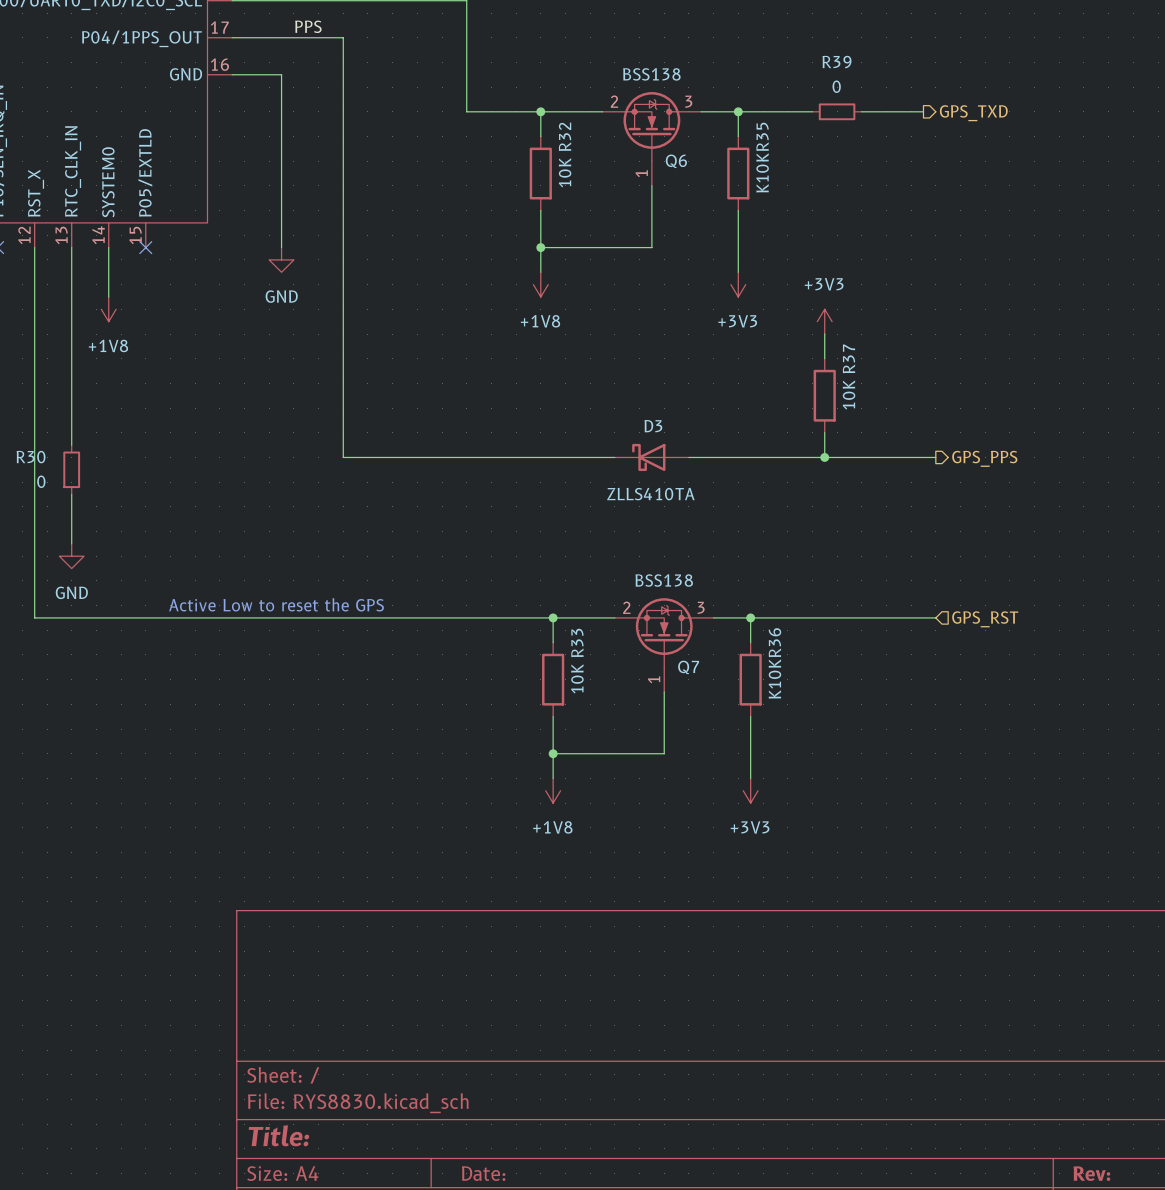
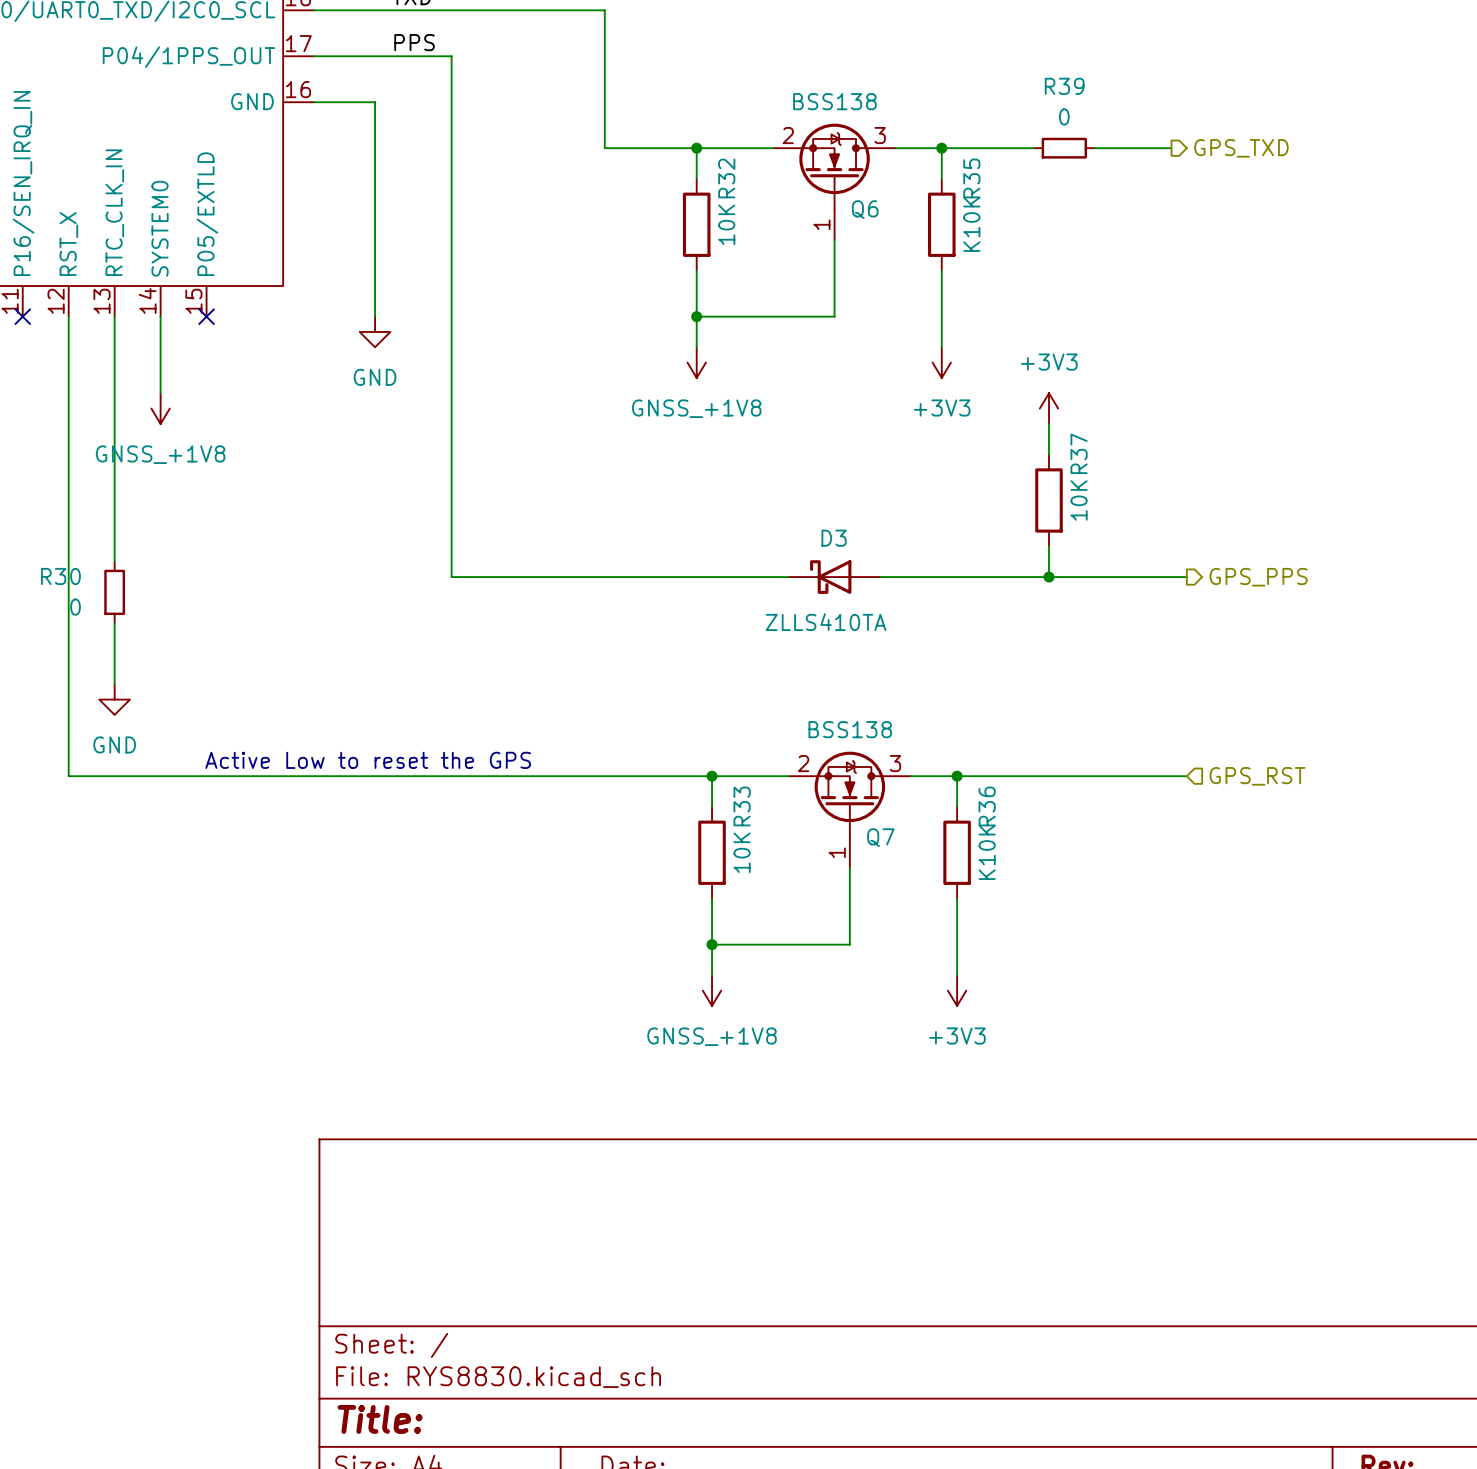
power symbol: +1V8 (540, 284) -> GNSS_+1V8 (696, 362)
power symbol: +1V8 (108, 309) -> none
power symbol: none -> GNSS_+1V8 (160, 408)
power symbol: +1V8 (553, 790) -> GNSS_+1V8 (712, 990)

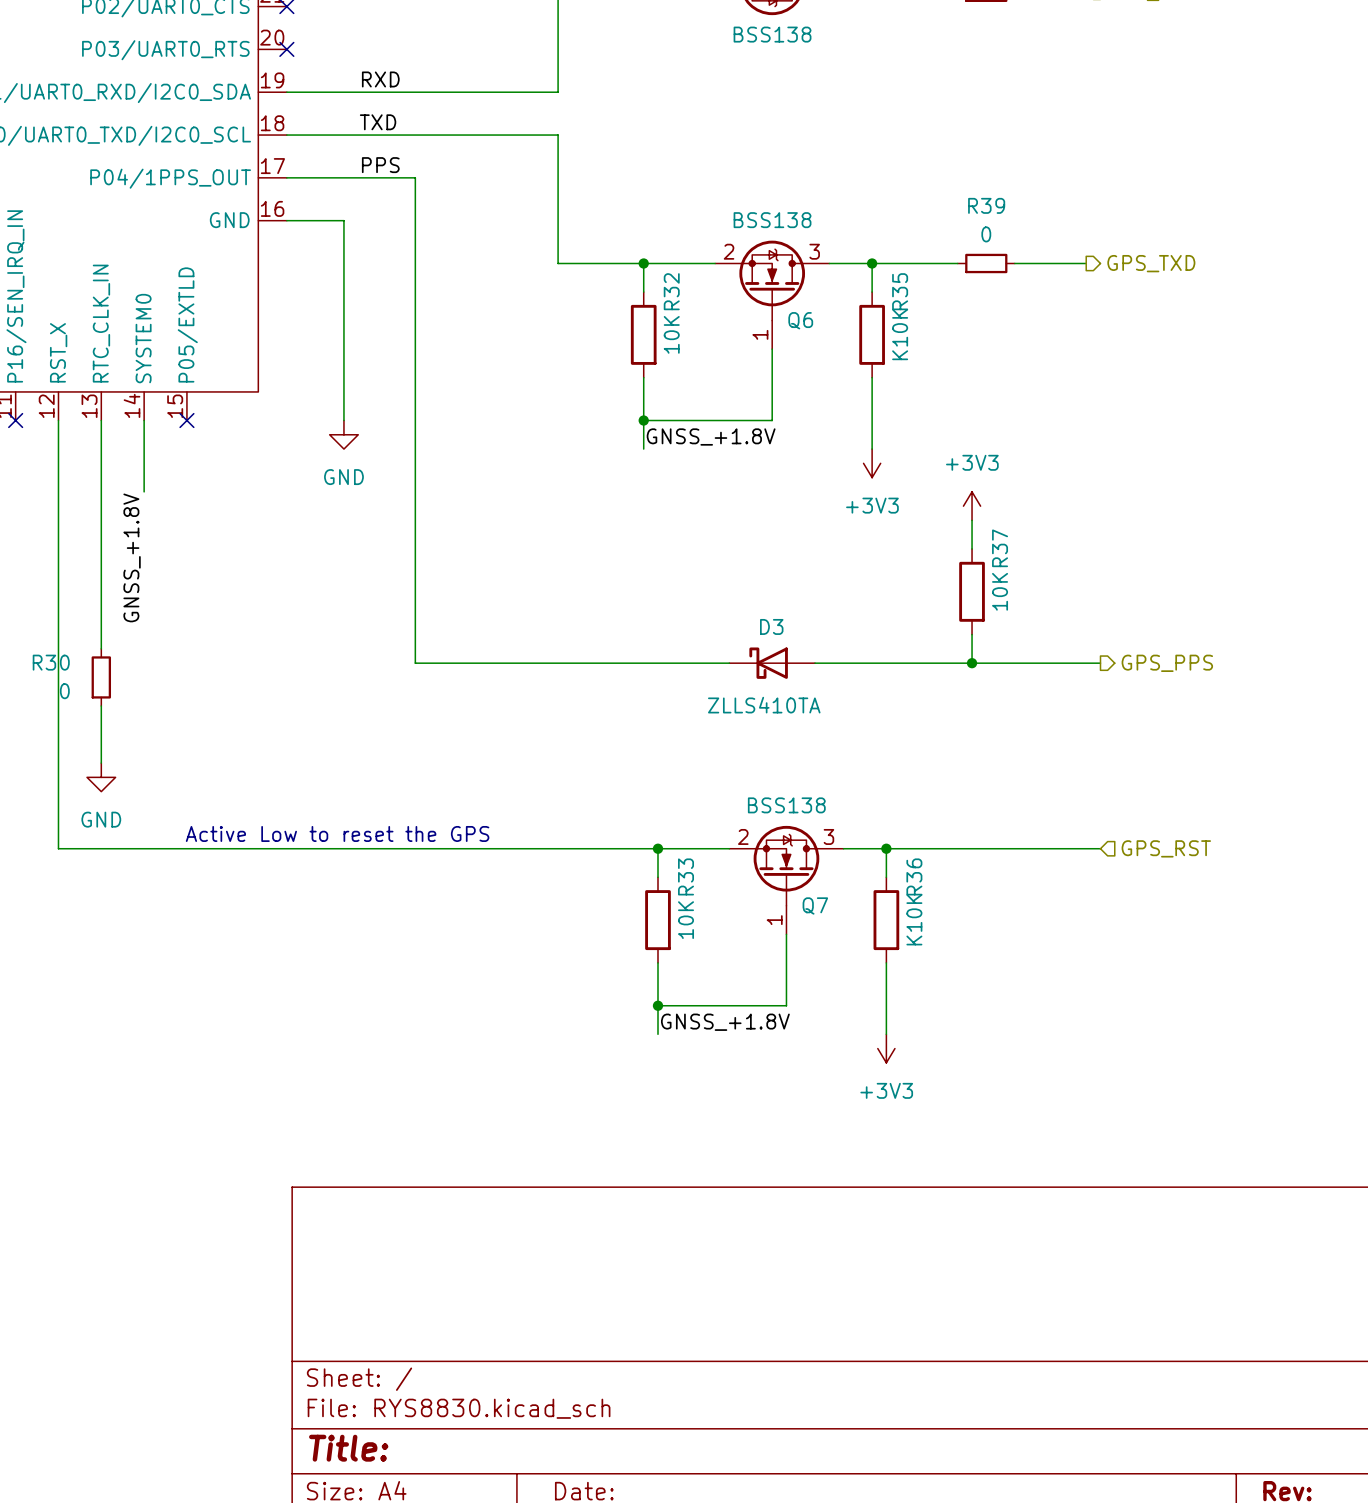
label: none -> GNSS_+1.8V (711, 437)
power symbol: GNSS_+1V8 (696, 362) -> none
power symbol: GNSS_+1V8 (160, 408) -> none
label: none -> GNSS_+1.8V (132, 557)
label: none -> GNSS_+1.8V (725, 1022)
power symbol: GNSS_+1V8 (712, 990) -> none

